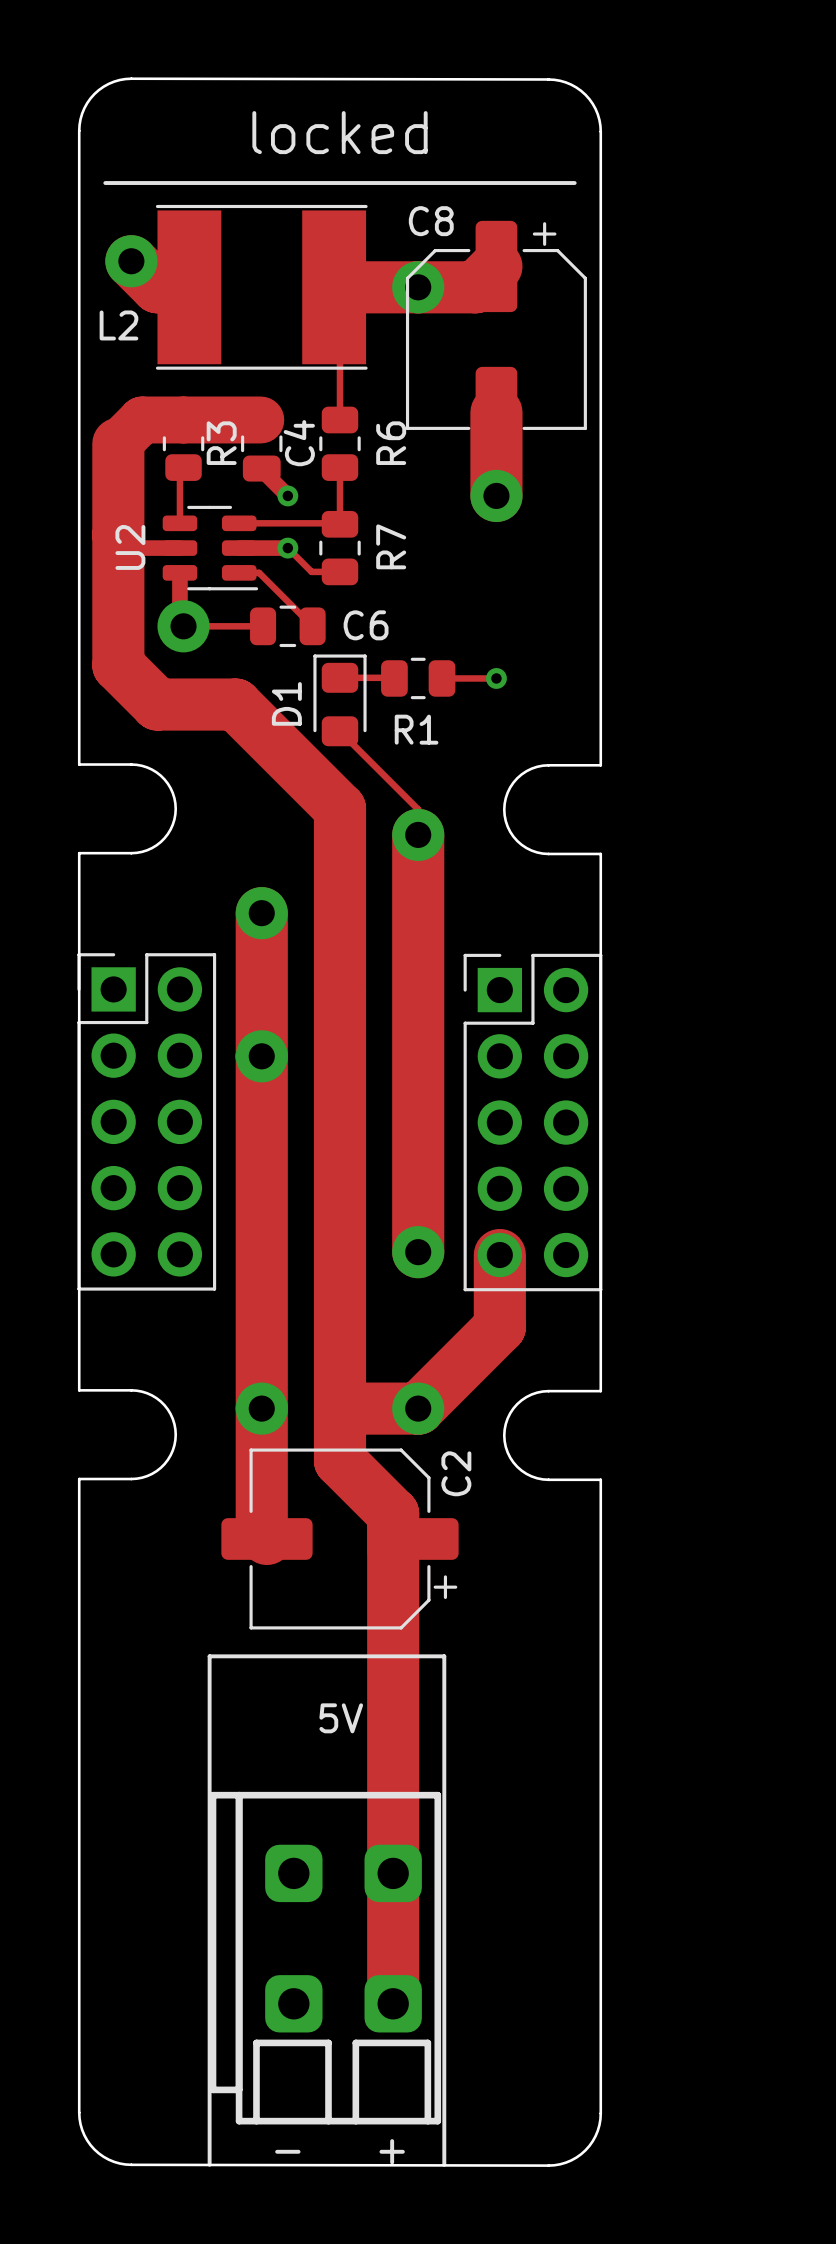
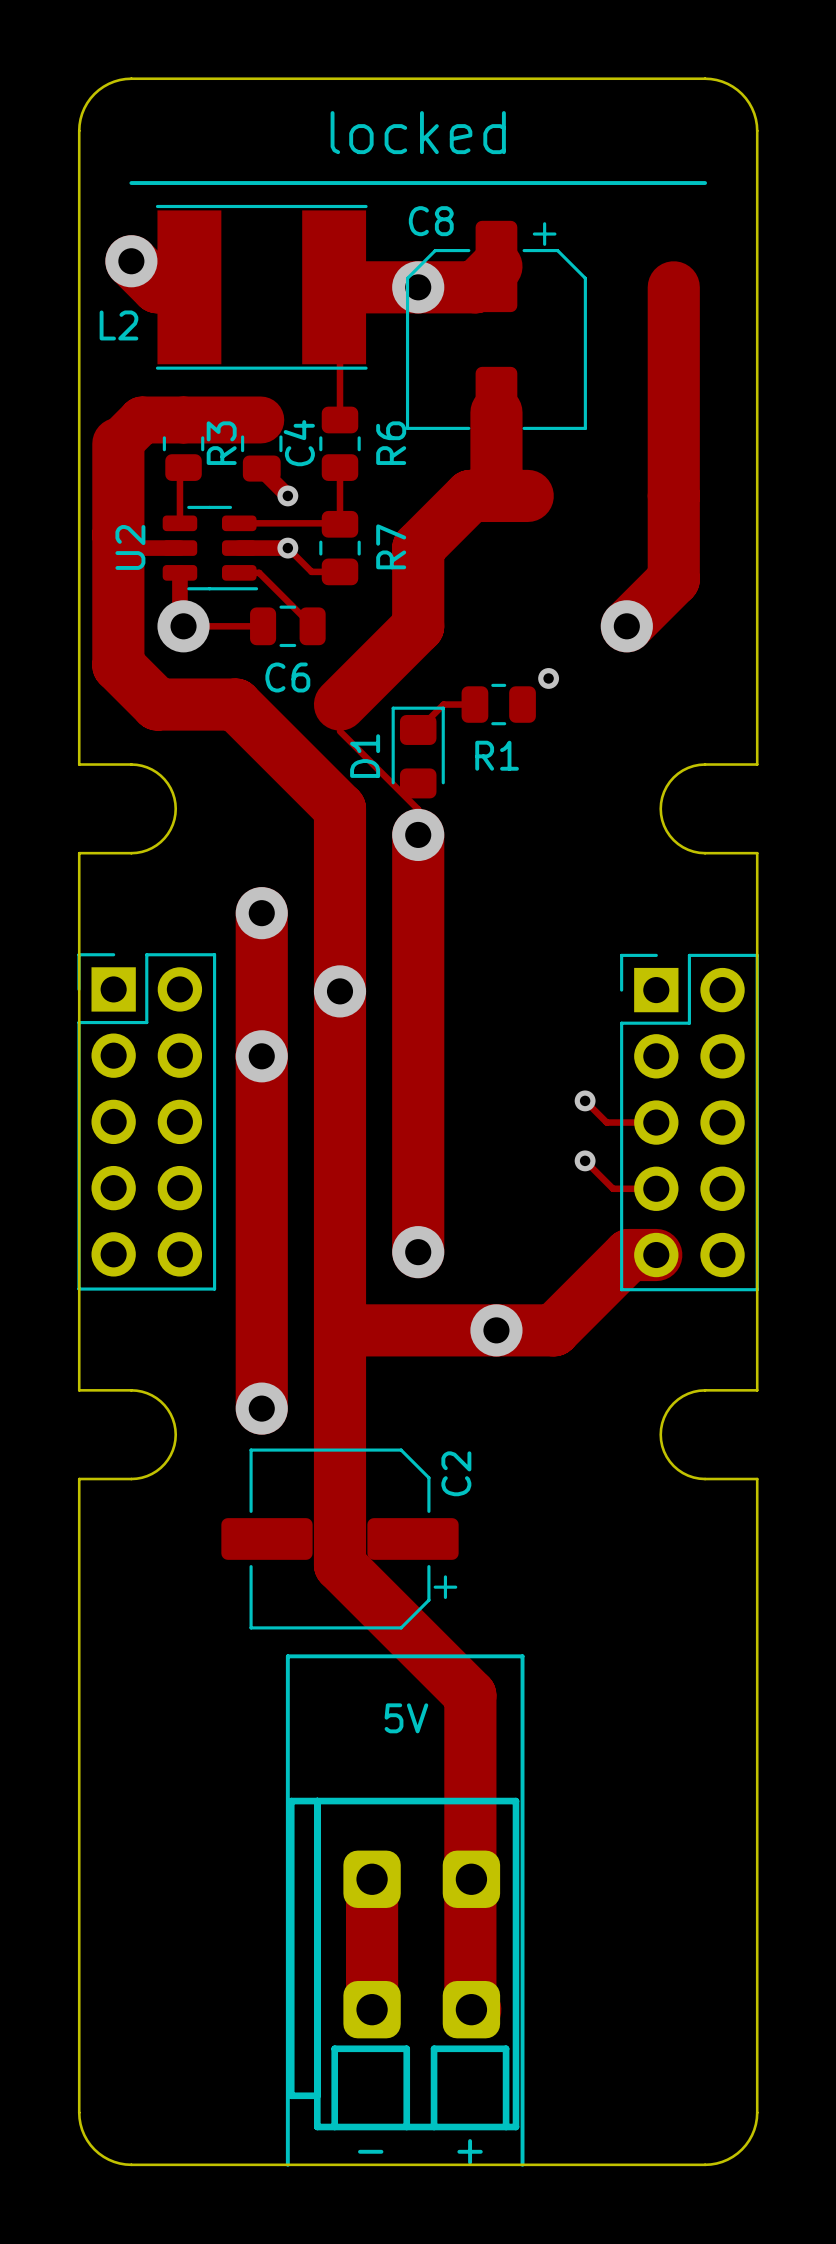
board edge: (131, 78) (554, 79) (571, 84) (585, 94) (595, 109) (600, 131) (600, 765) (548, 765) (531, 768) (521, 774) (513, 782) (507, 792) (504, 809) (507, 826) (513, 836) (521, 844) (531, 850) (548, 853) (600, 853) (600, 1391) (548, 1391) (531, 1394) (521, 1400) (513, 1408) (505, 1423) (504, 1435) (505, 1446) (513, 1462) (521, 1470) (531, 1476) (548, 1479) (600, 1479) (599, 2125) (592, 2141) (585, 2150) (571, 2160) (554, 2165) (131, 2164) -> (131, 78) (710, 79) (732, 86) (745, 98) (754, 113) (757, 130) (757, 764) (705, 764) (688, 767) (678, 773) (669, 781) (664, 791) (660, 808) (664, 825) (669, 835) (678, 844) (688, 849) (705, 853) (757, 853) (757, 1390) (705, 1390) (688, 1393) (678, 1399) (669, 1407) (662, 1423) (660, 1434) (662, 1446) (669, 1461) (678, 1469) (688, 1475) (705, 1479) (757, 1479) (757, 2112) (754, 2129) (745, 2145) (732, 2156) (716, 2163) (705, 2164) (131, 2164)
text position: locked (340, 132) -> locked (418, 132)
line: (105, 183) (131, 183) -> none
line: none -> (574, 183) (705, 183)
track: none -> (673, 287) (673, 579) (626, 626)
via: (496, 495) -> none
track: none -> (527, 495) (470, 495) (418, 548) (418, 626) (340, 704)
C6 name position: C6 (366, 625) -> C6 (287, 677)
via: none -> (626, 626)
R1 position: (418, 678) -> (498, 704)
track: (442, 678) (496, 678) -> none
via position: (496, 678) -> (548, 678)
D1 position: (340, 700) -> (418, 752)
track: none -> (474, 704) (443, 704) (418, 729)
via: none -> (340, 991)
track: none -> (585, 1100) (606, 1122) (656, 1122)
via: none -> (585, 1100)
part position: (532, 1122) -> (689, 1122)
track: none -> (585, 1160) (613, 1188) (656, 1188)
via: none -> (585, 1160)
track: (499, 1255) (499, 1326) (418, 1408) (340, 1408) -> none
track: none -> (656, 1255) (629, 1255) (553, 1330) (340, 1330)
track: (261, 1408) (261, 1533) (266, 1538) -> none
via position: (418, 1408) -> (496, 1330)
track: (340, 1460) (393, 1513) (393, 2003) -> (340, 1460) (340, 1565) (470, 1695) (470, 2004) (475, 2009)
line: (287, 1656) (209, 1656) (209, 2164) -> (287, 1656) (287, 2164)
line: (444, 1656) (444, 2164) -> (444, 1656) (522, 1656) (522, 2164)
text position: 5V (341, 1718) -> 5V (406, 1718)
track: none -> (372, 1885) (372, 2003)
part position: (325, 1958) -> (403, 1964)
line: (392, 2141) (392, 2162) -> (470, 2141) (470, 2162)
line: (277, 2151) (298, 2151) -> (459, 2151) (480, 2151)
line: (381, 2151) (402, 2151) -> (381, 2151) (360, 2151)

